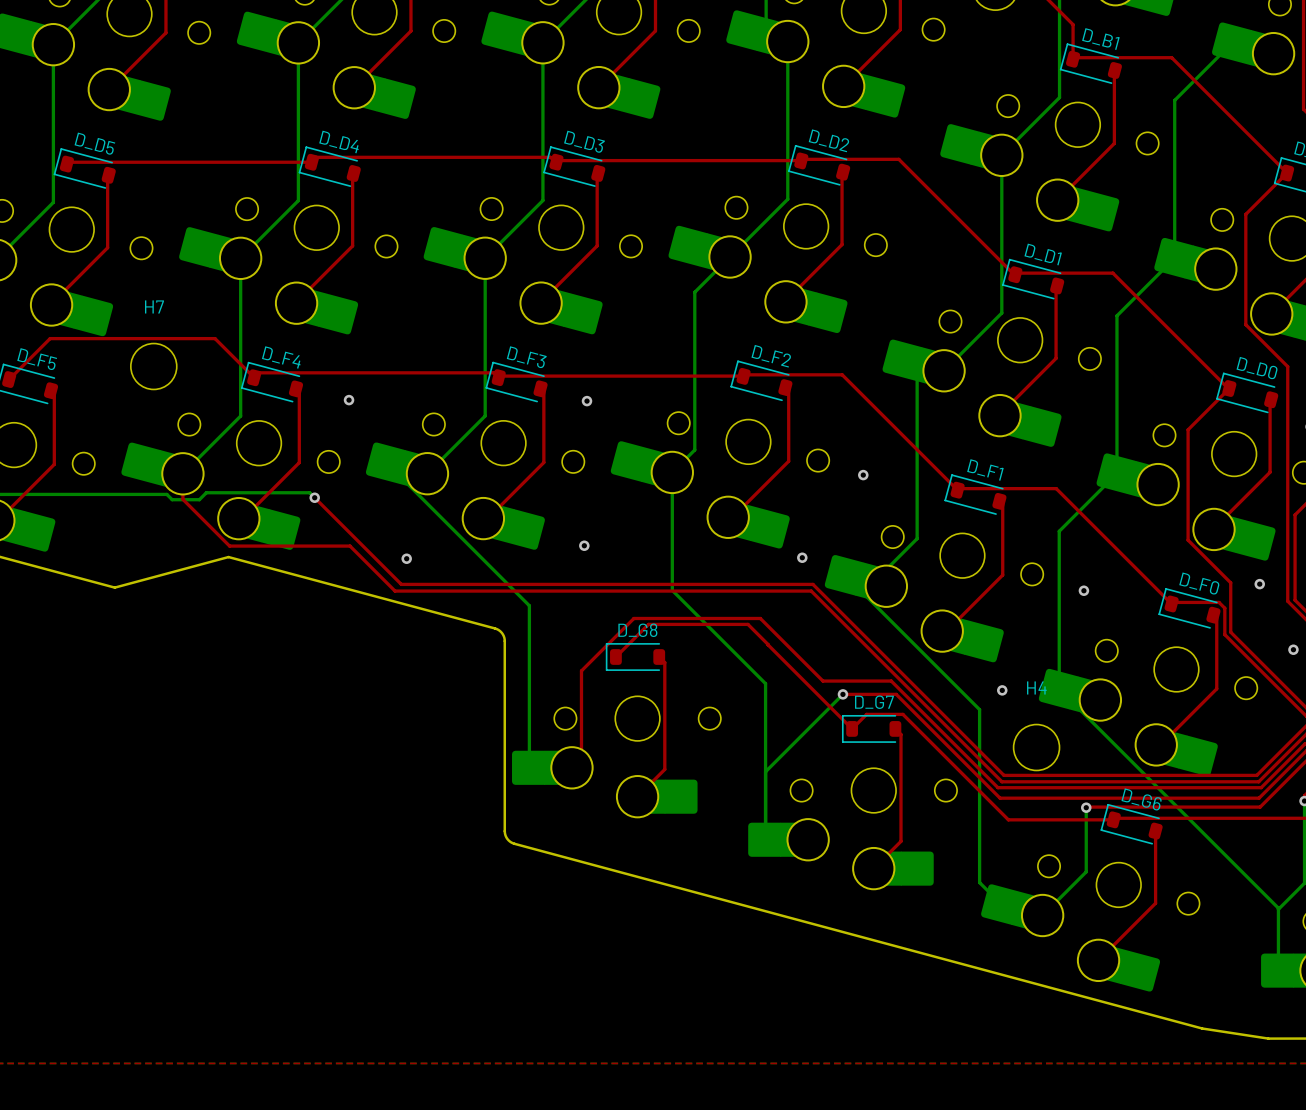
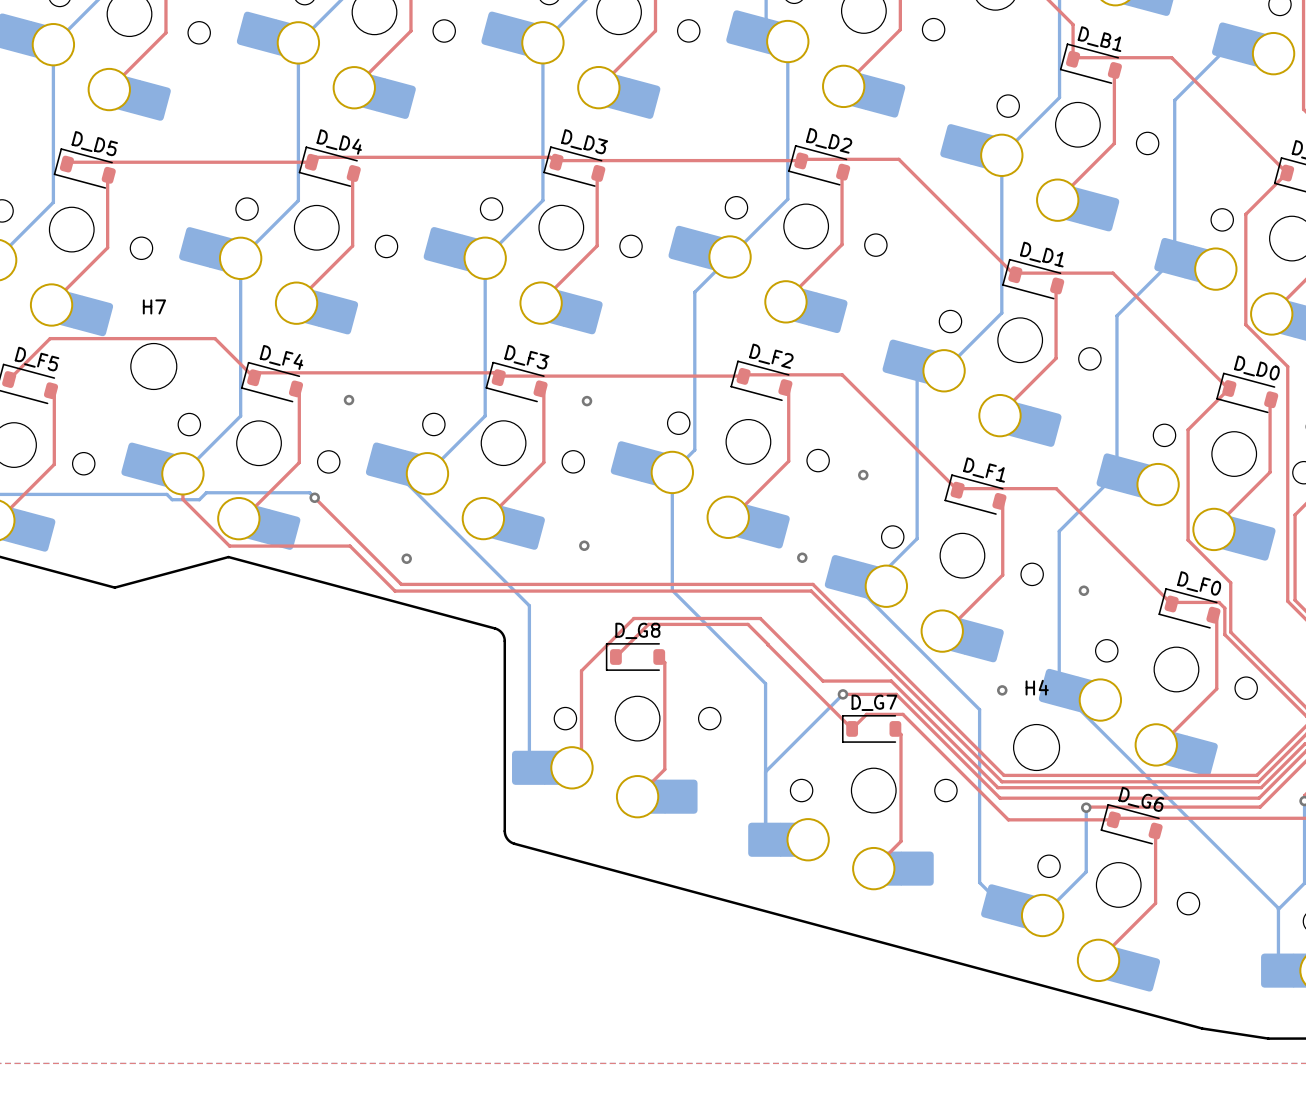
via: (1259, 584) -> none
via: (1293, 649) -> none

